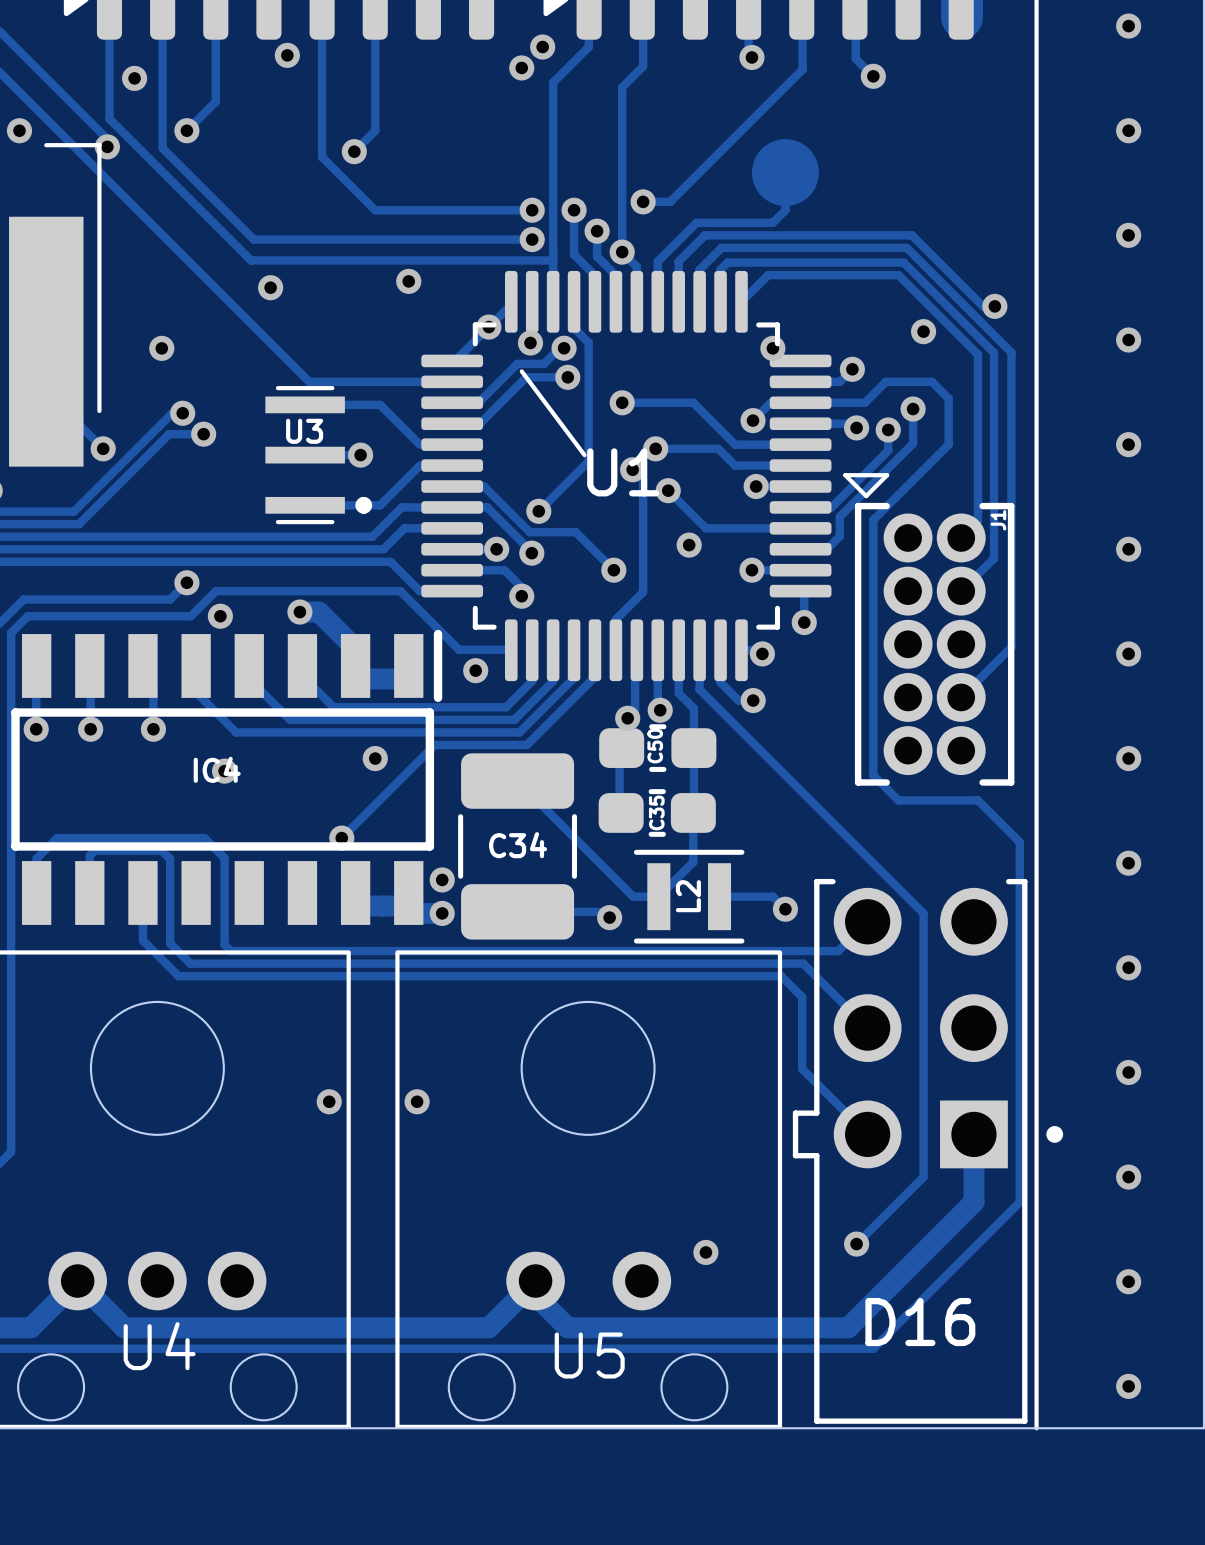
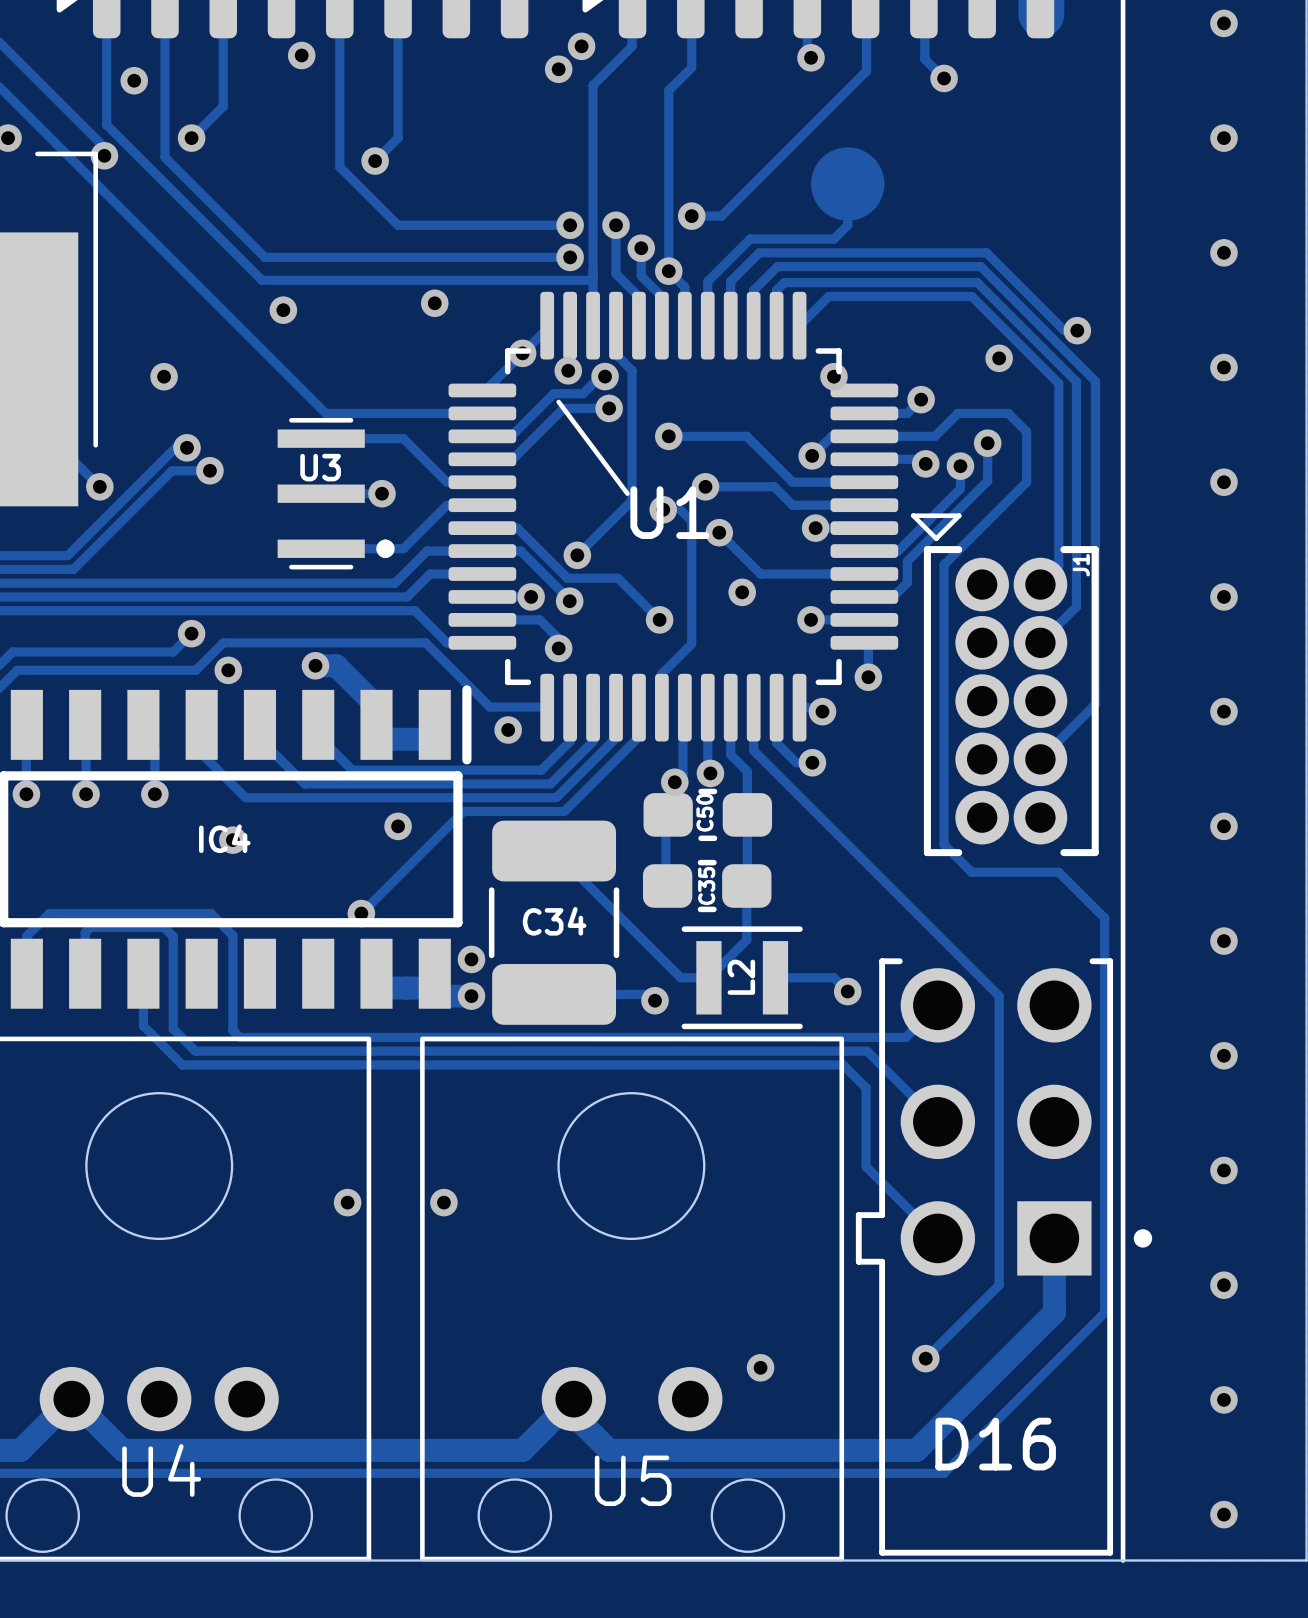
via position: (632, 469) -> (663, 509)

